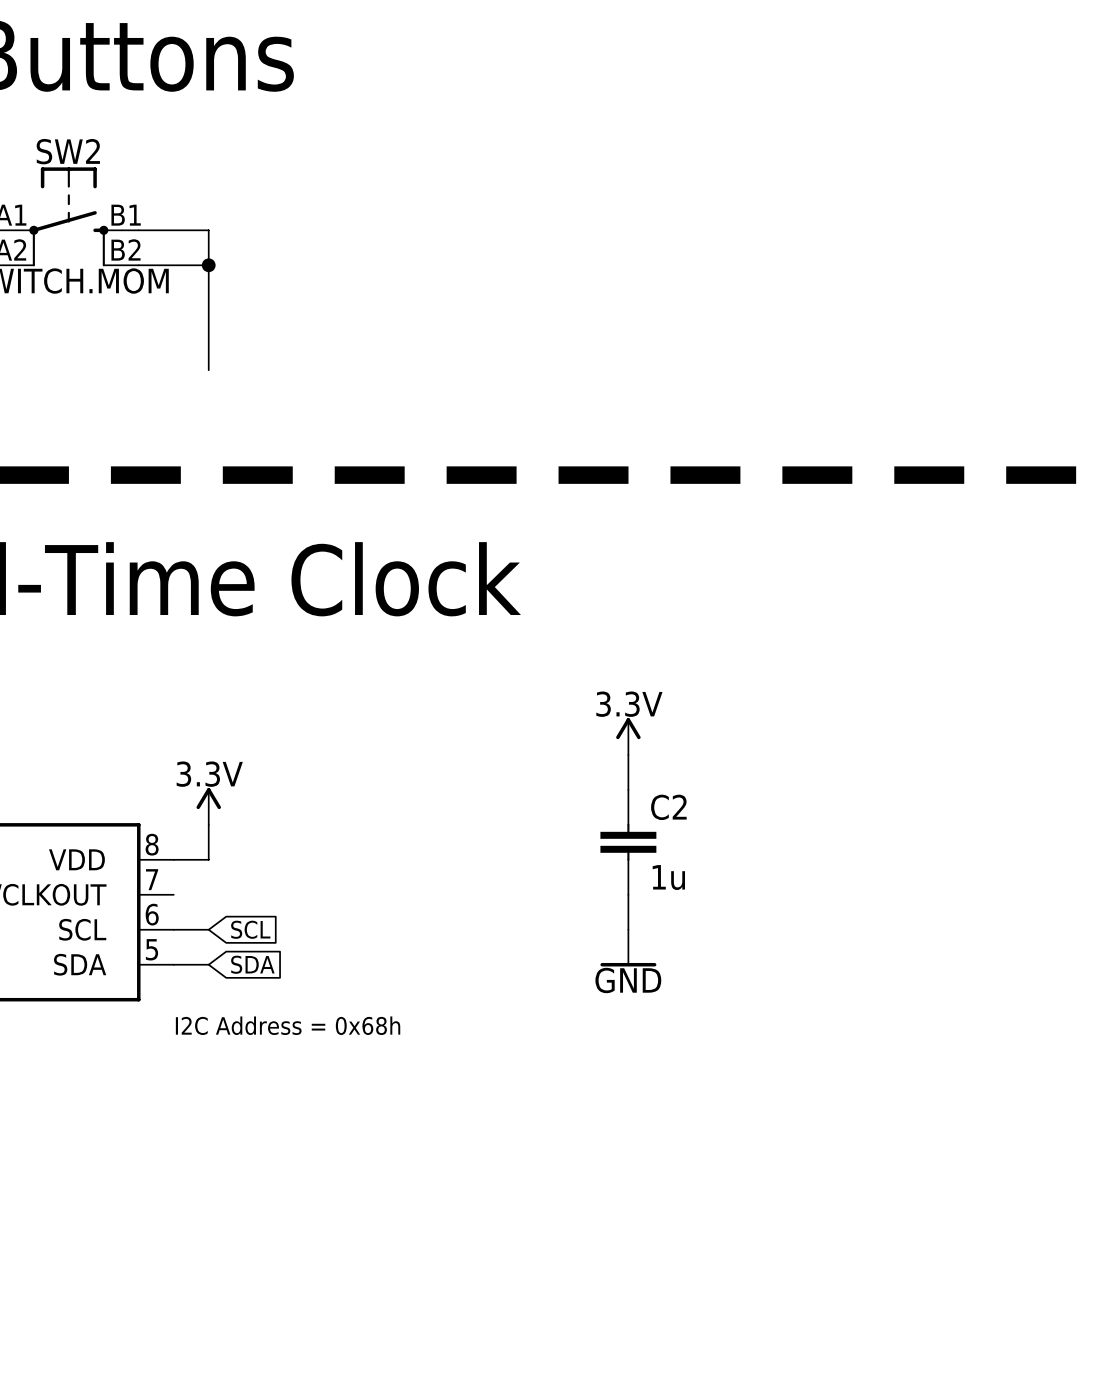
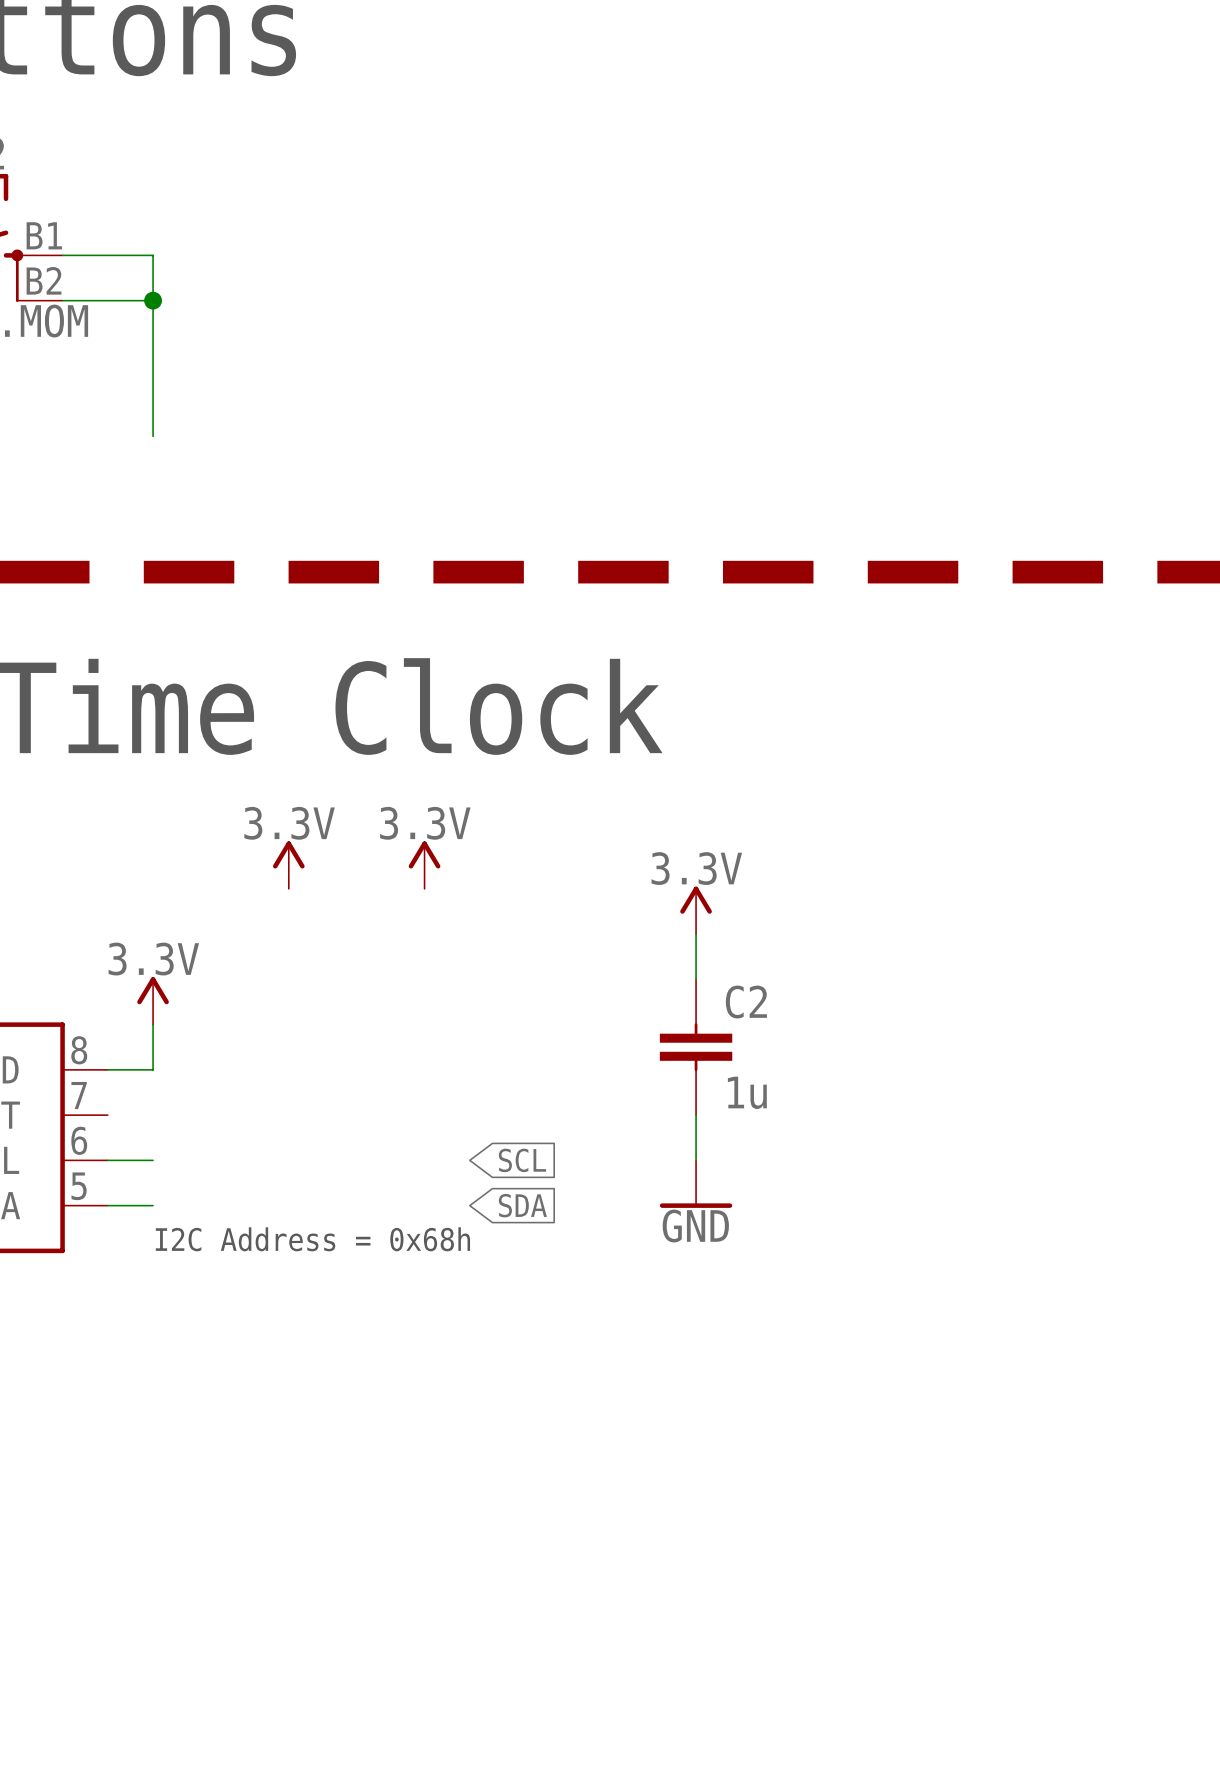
power symbol: none -> 3.3V (288, 865)
power symbol: none -> 3.3V (424, 865)
global label position: SCL (250, 929) -> SCL (522, 1160)
global label position: SDA (252, 964) -> SDA (522, 1205)
text position: I2C Address = 0x68h (288, 1025) -> I2C Address = 0x68h (312, 1239)

